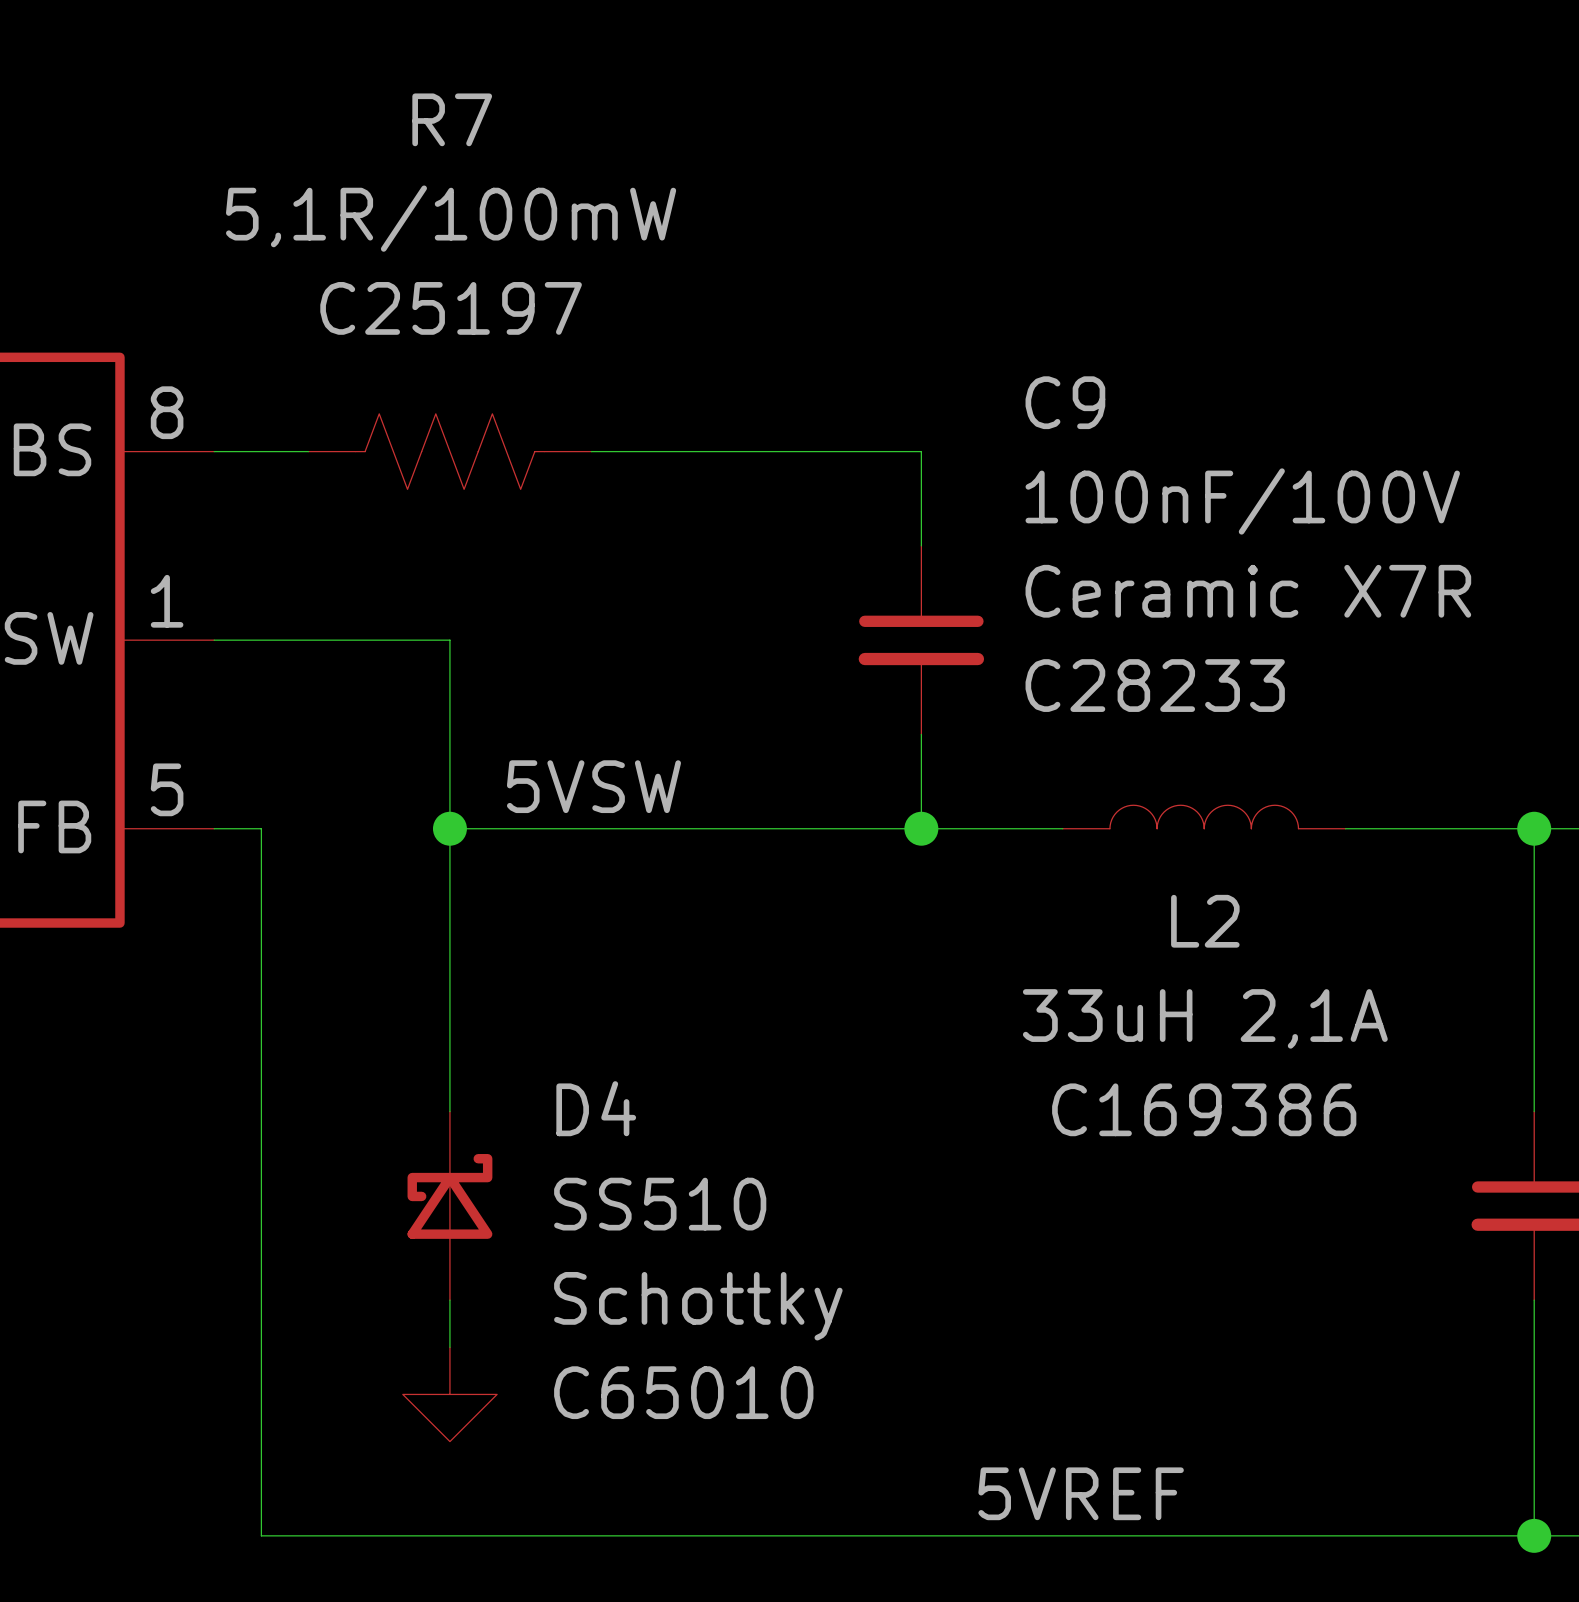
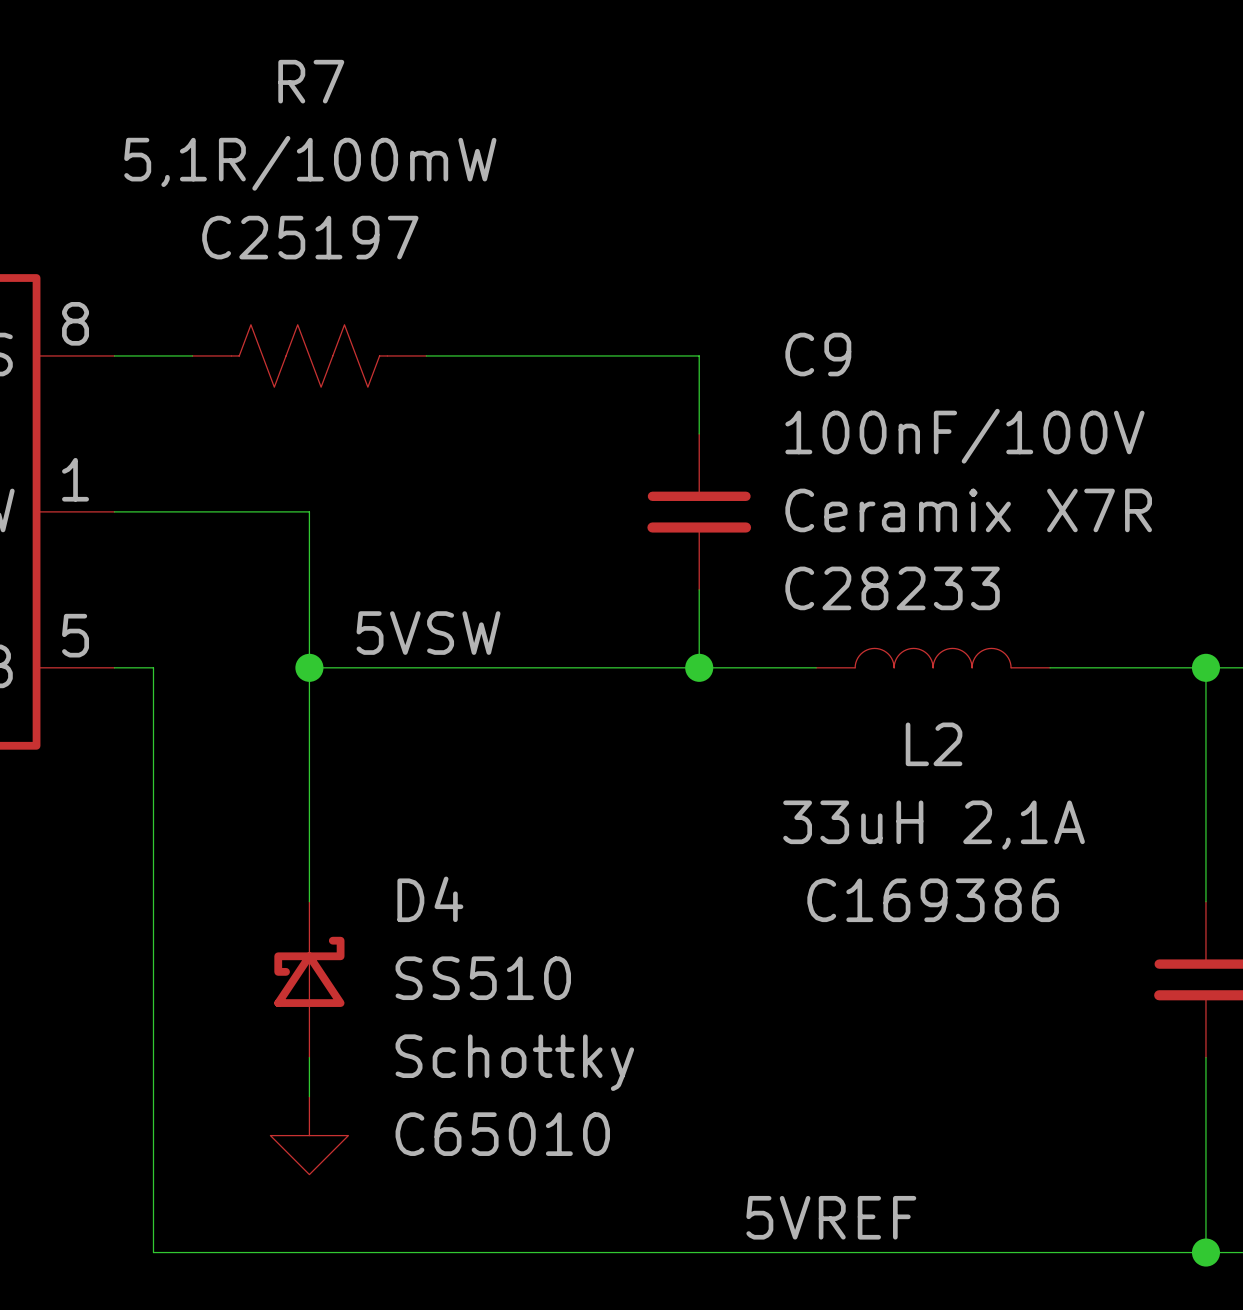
C9 name position: C9 (1065, 402) -> C9 (818, 354)
C9 value position: 100nF/100V (1242, 501) -> 100nF/100V (964, 436)
C9 text: Ceramic X7R (1248, 591) -> Ceramix X7R (968, 510)
C9 text position: C28233 (1155, 685) -> C28233 (892, 588)

